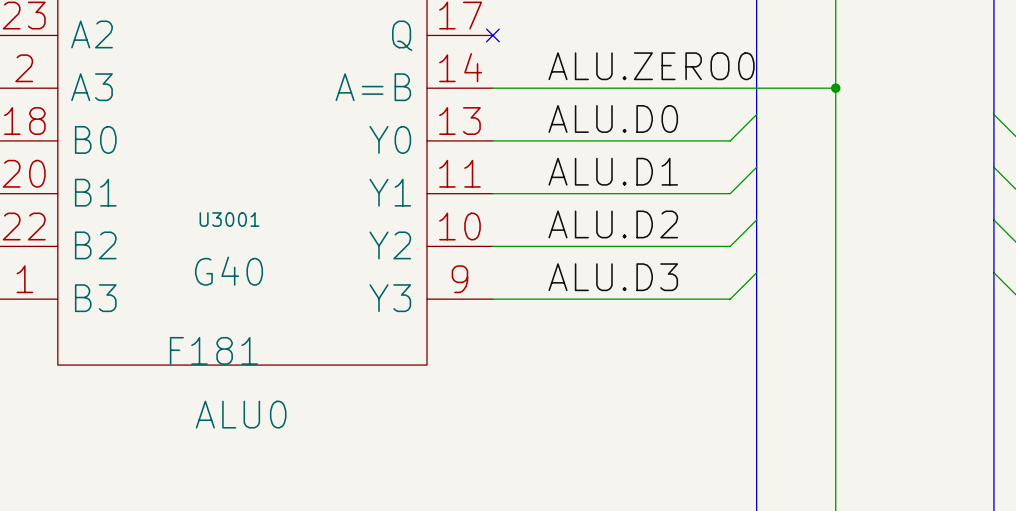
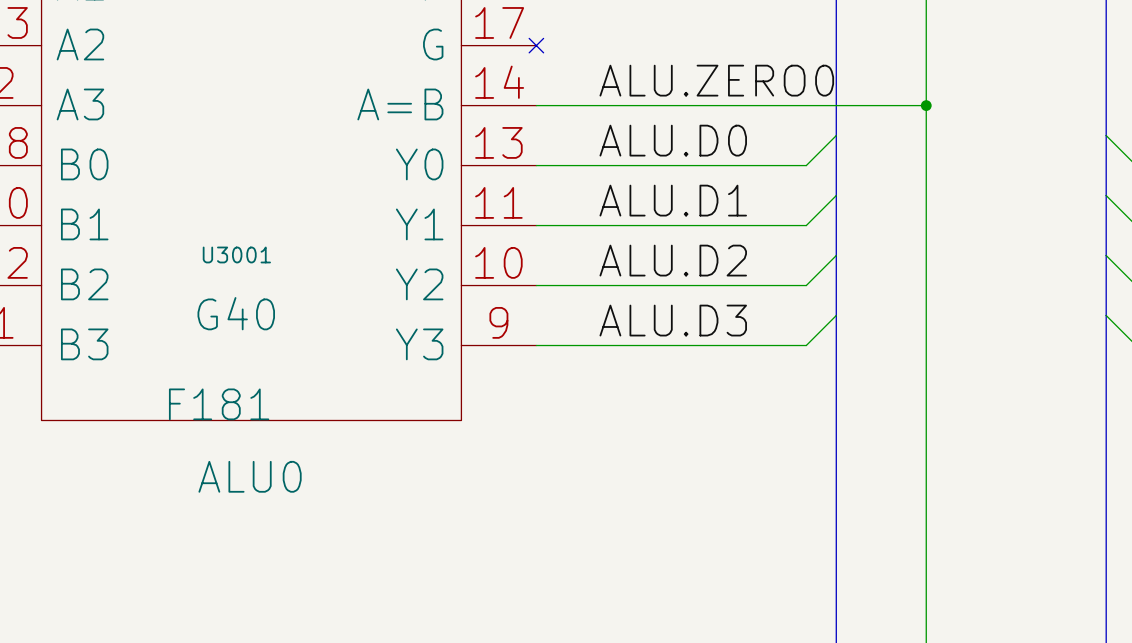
U3001 pin name: Q (402, 35) -> G (433, 44)

